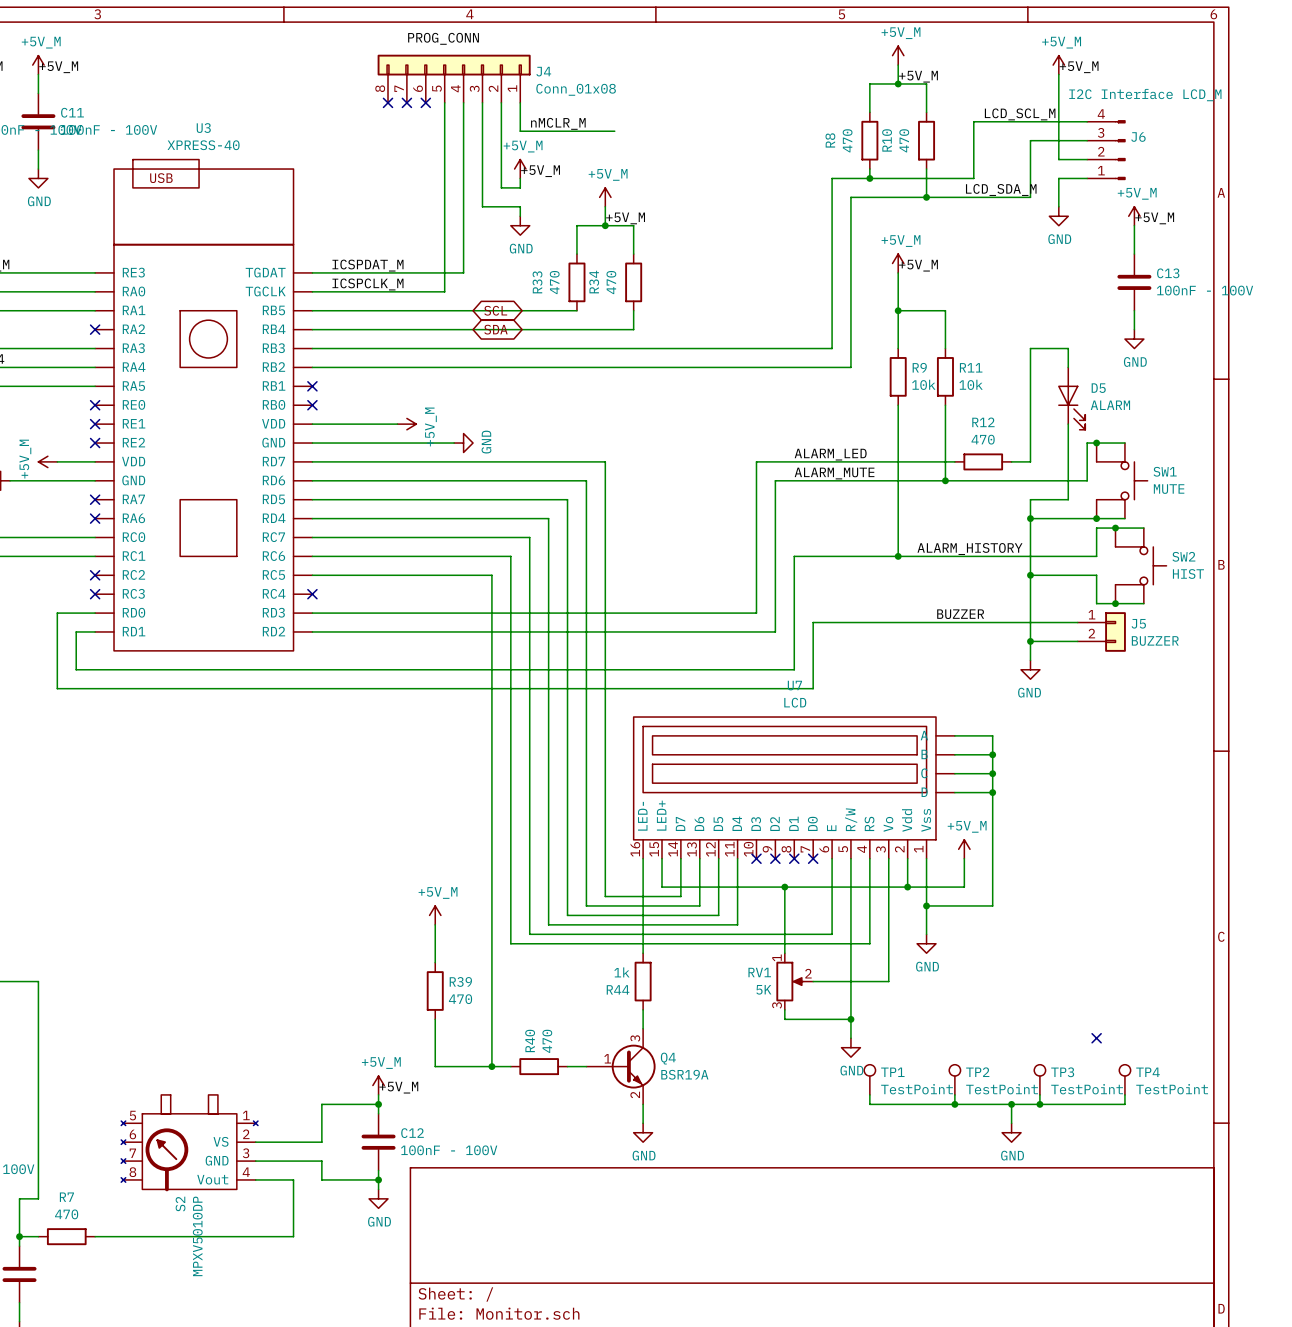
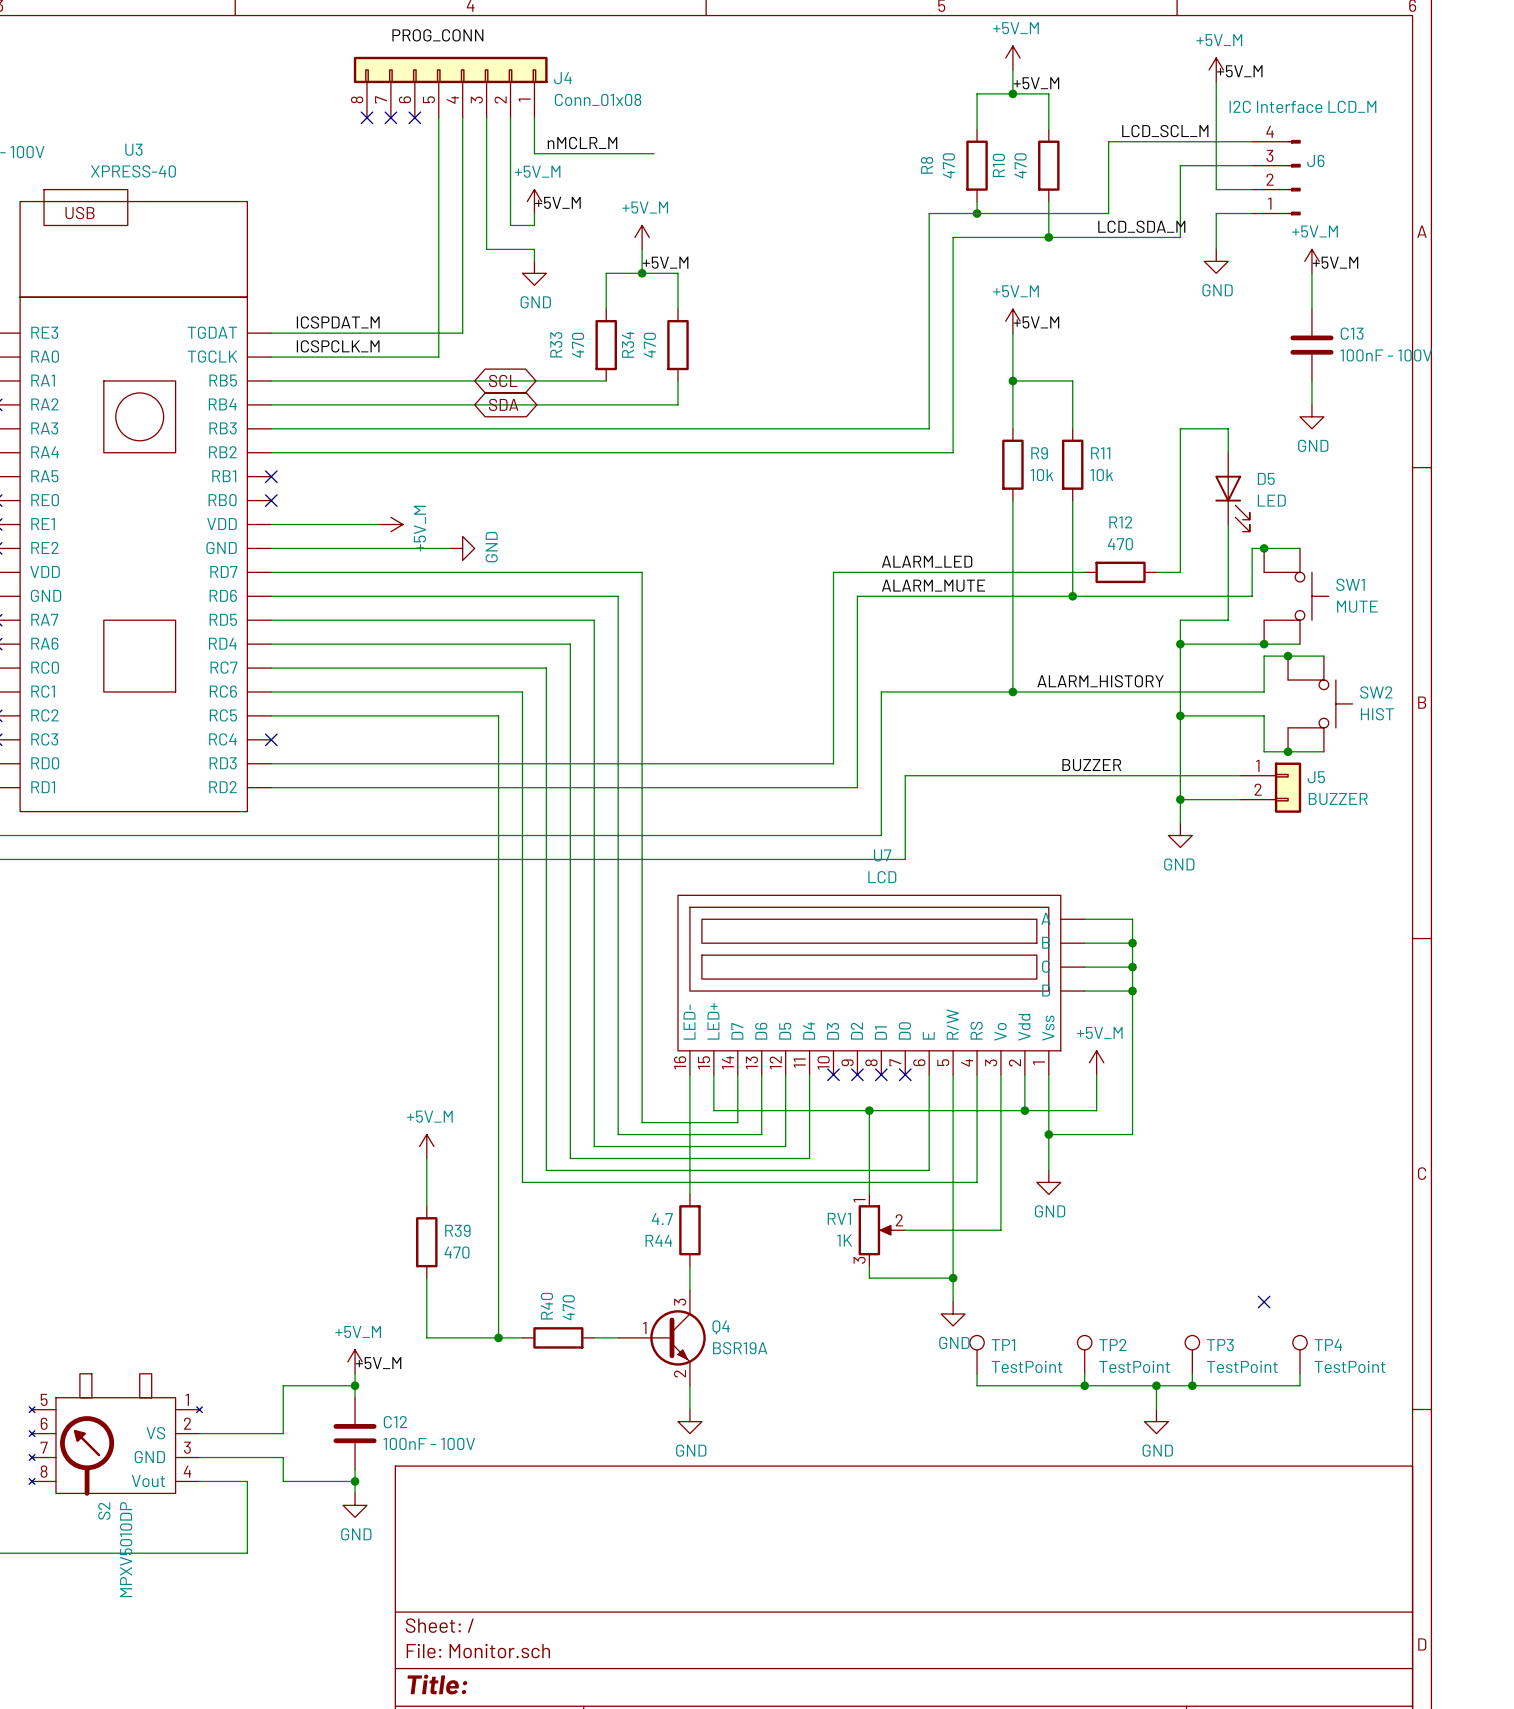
D5 value: ALARM (1110, 405) -> LED (1271, 500)
R44 value: 1k (621, 972) -> 4.7 (662, 1219)
RV1 value: 5K (763, 989) -> 1K (844, 1240)

